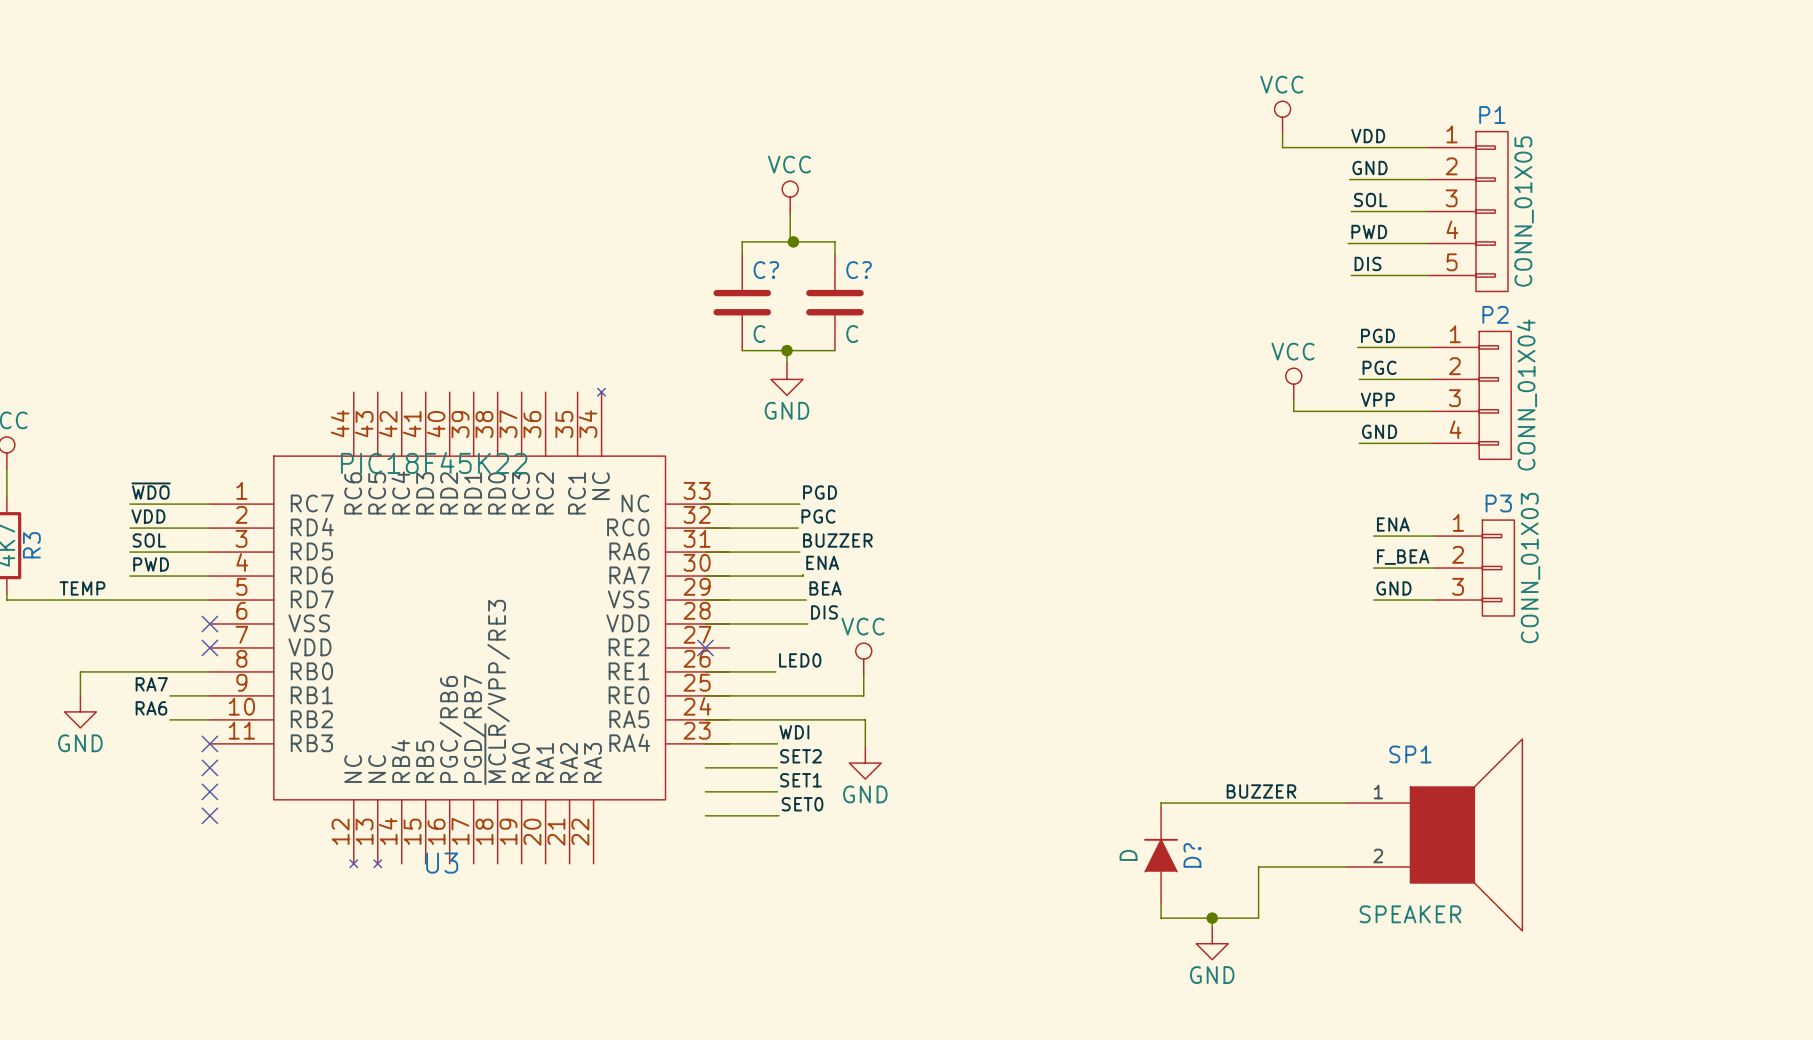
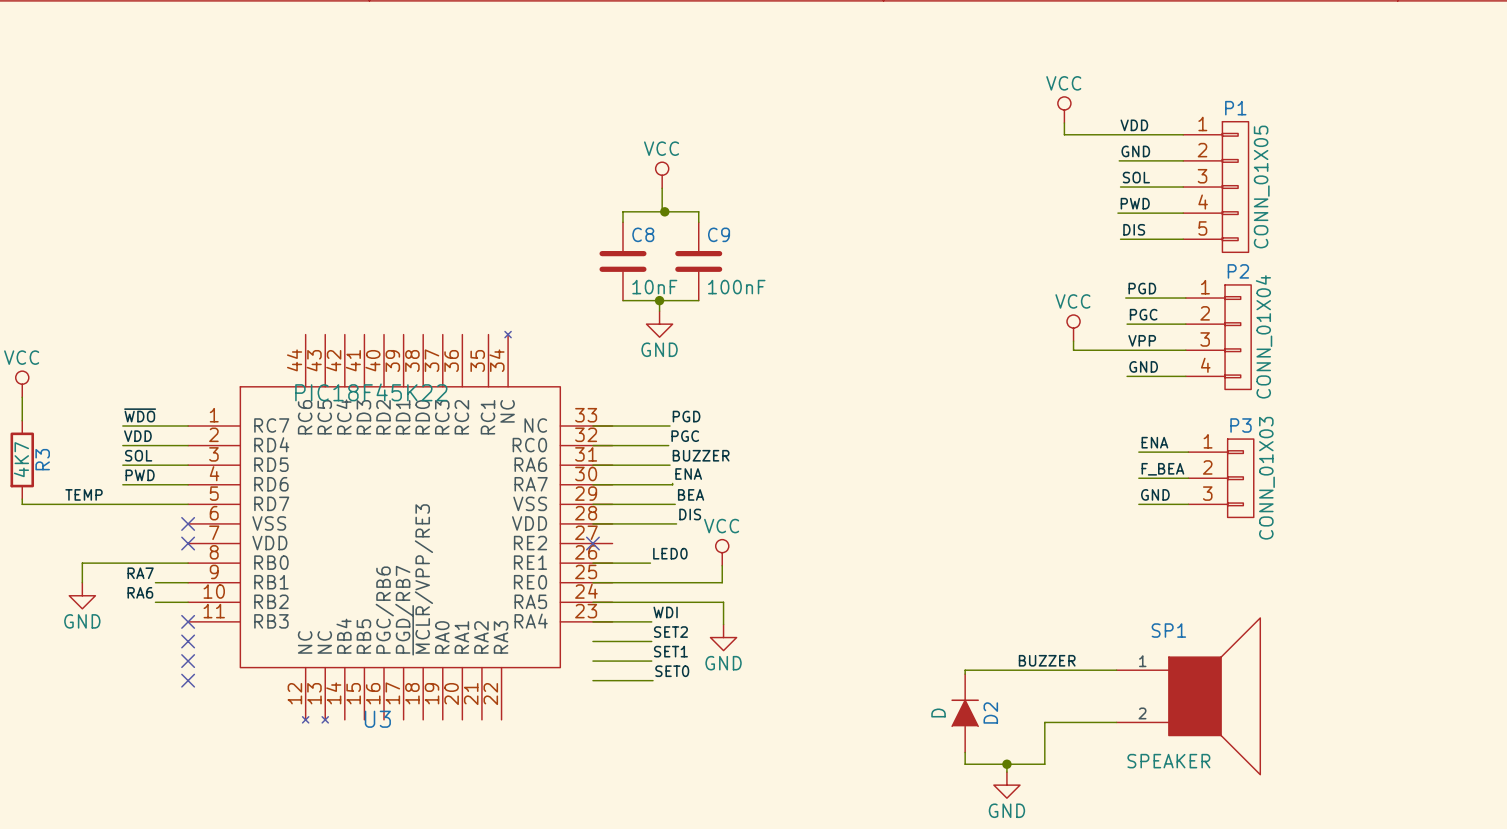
C? name: C? (766, 270) -> C8 (643, 234)
C? name: C? (859, 270) -> C9 (719, 234)
C? value: C (759, 334) -> 10nF (654, 287)
C? value: C (852, 334) -> 100nF (736, 287)
D? name: D? (1192, 855) -> D2 (990, 712)

